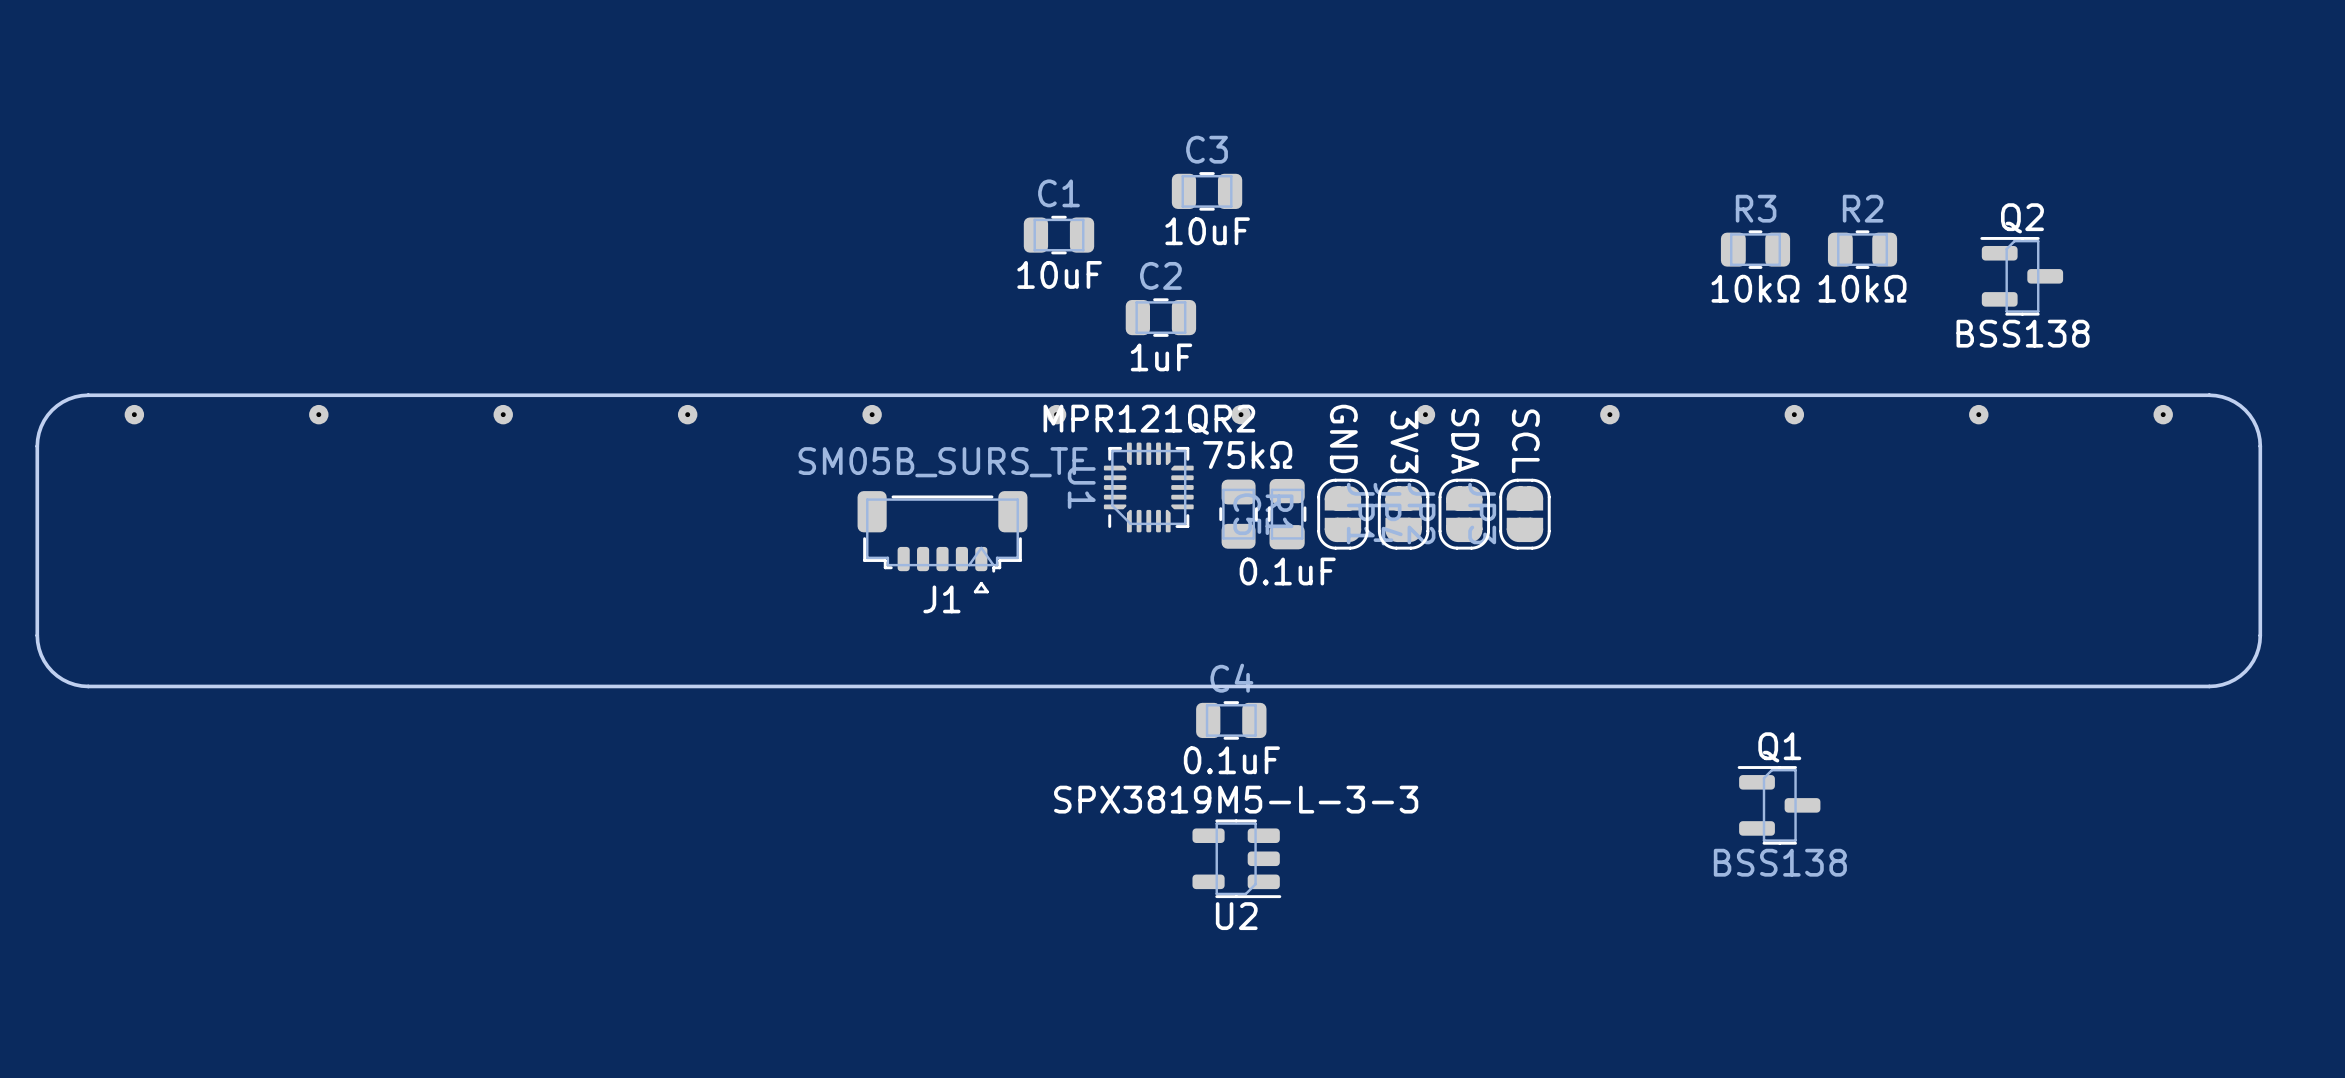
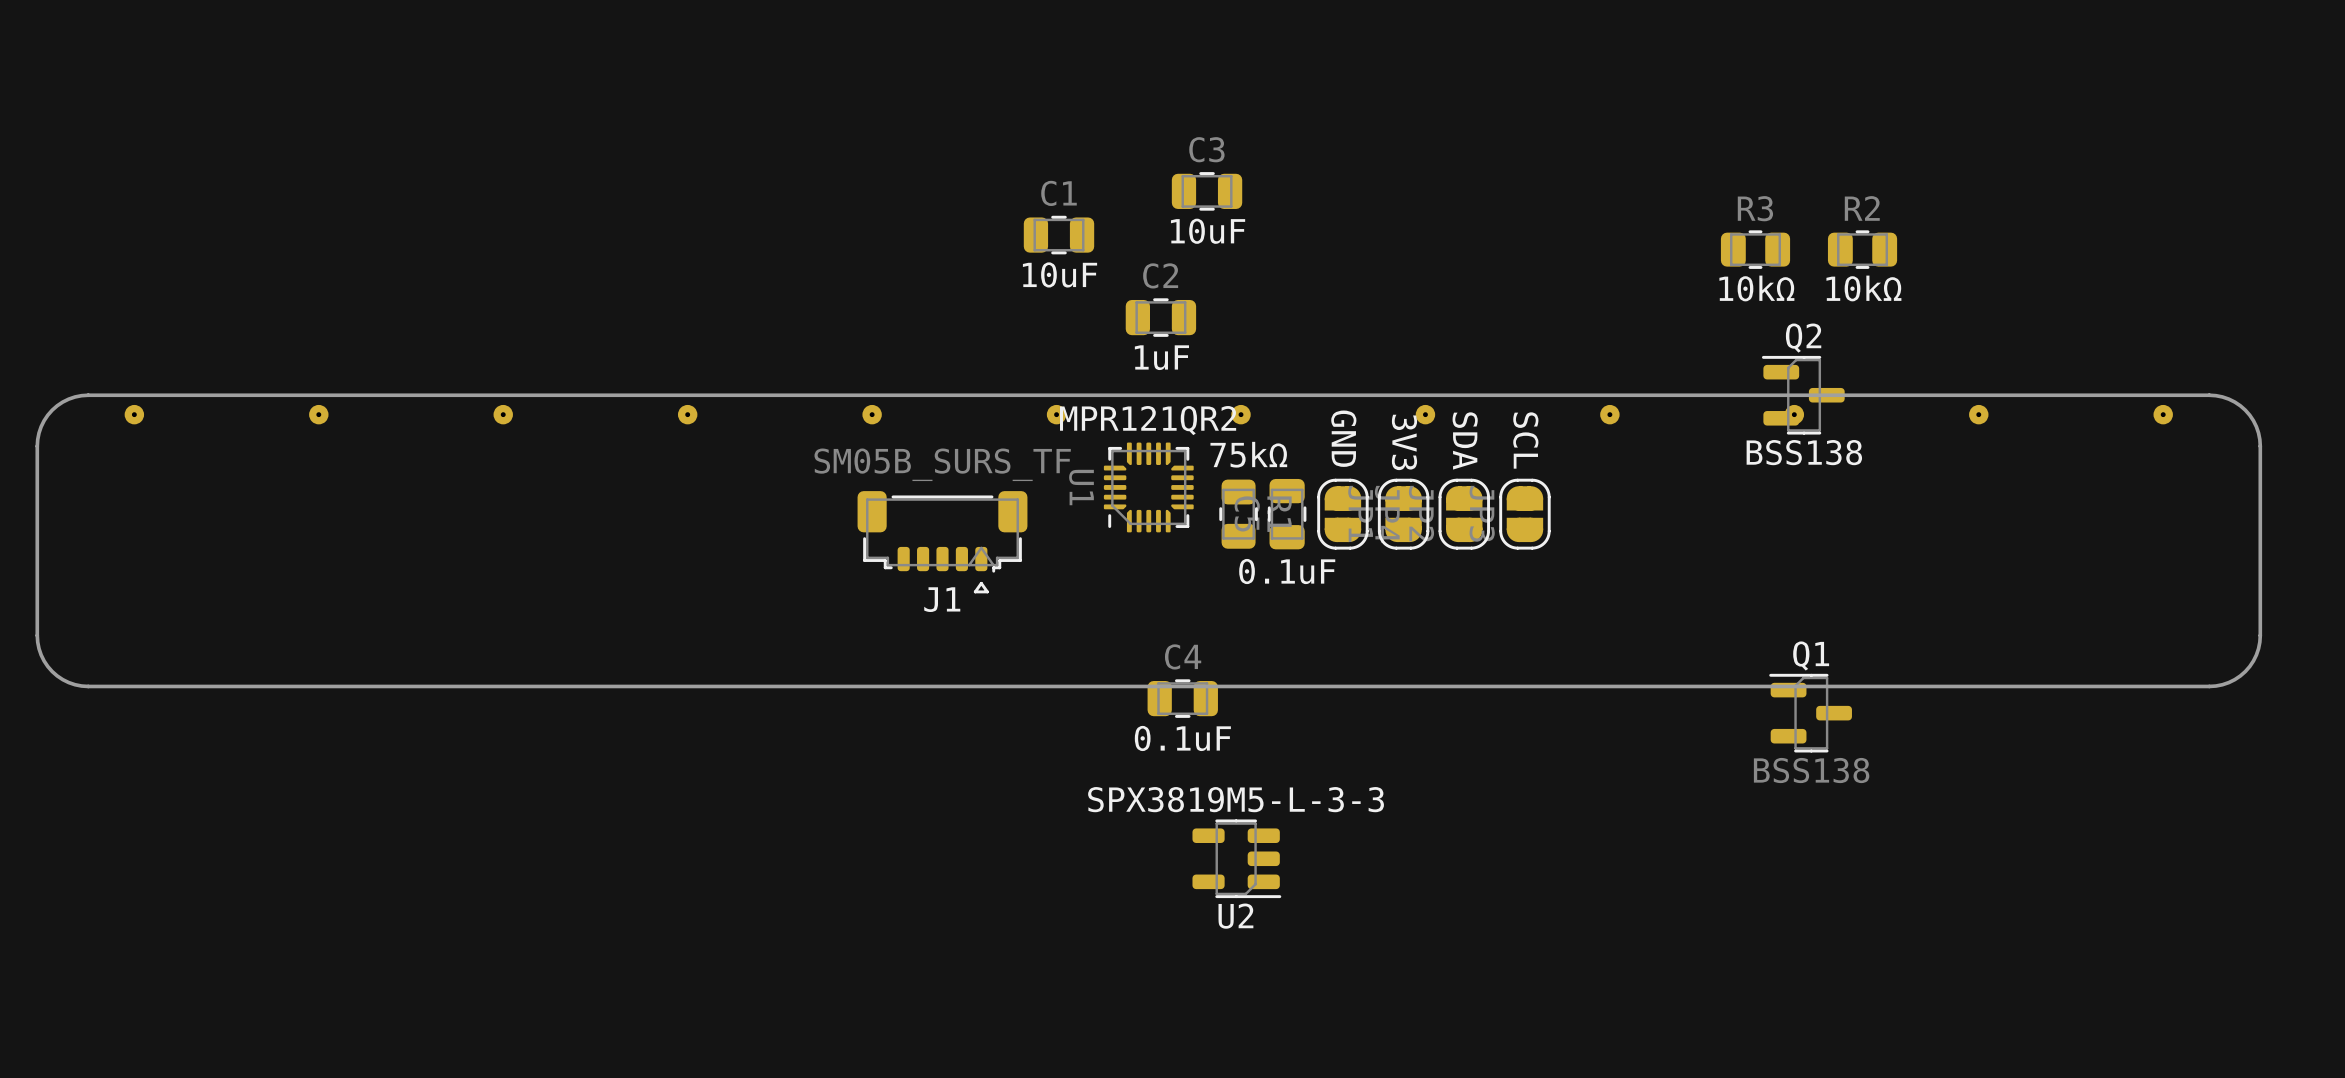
Q2 position: (2021, 276) -> (1803, 395)
C4 position: (1231, 720) -> (1182, 698)
Q1 position: (1779, 805) -> (1810, 713)

